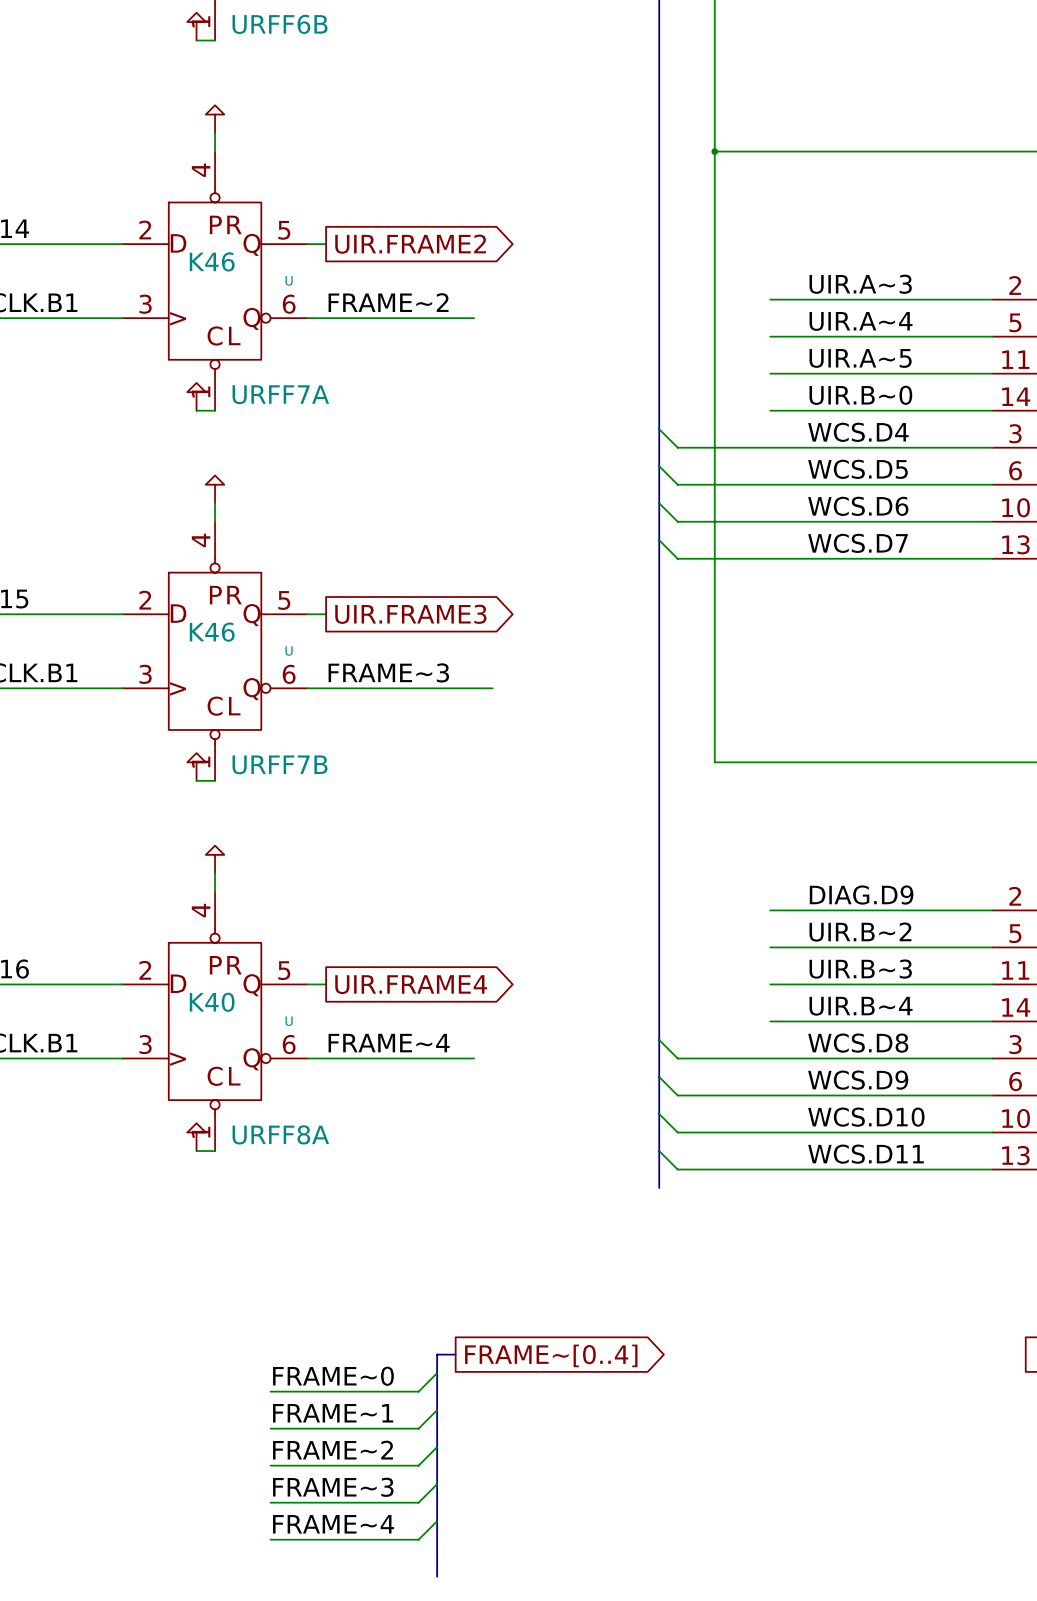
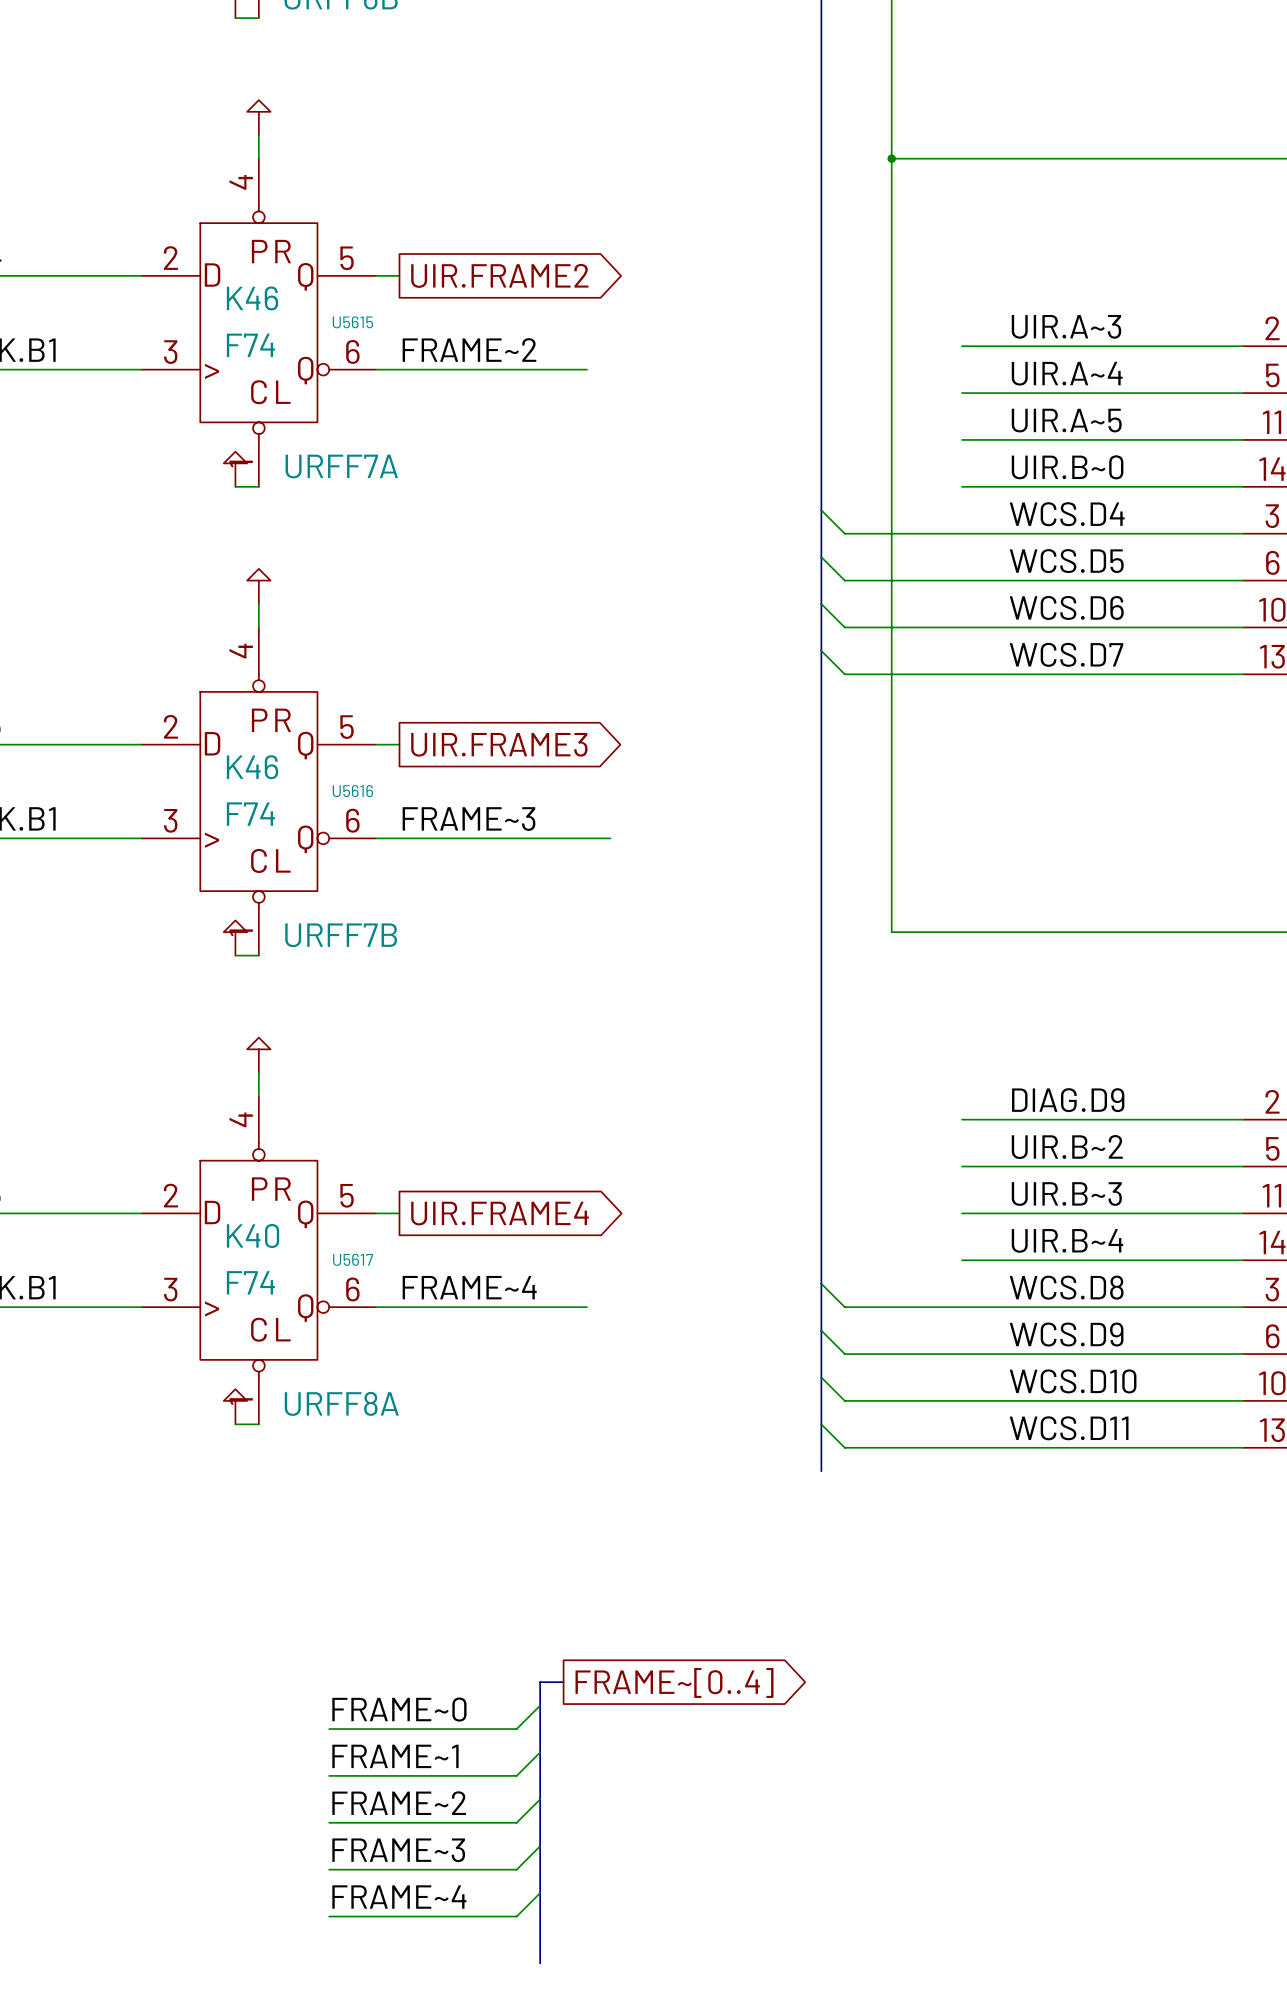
U name: U (289, 280) -> U5615 (352, 322)
U value: none -> F74 (250, 345)
U name: U (289, 651) -> U5616 (352, 791)
U value: none -> F74 (250, 814)
U name: U (289, 1021) -> U5617 (353, 1259)
U value: none -> F74 (250, 1282)

